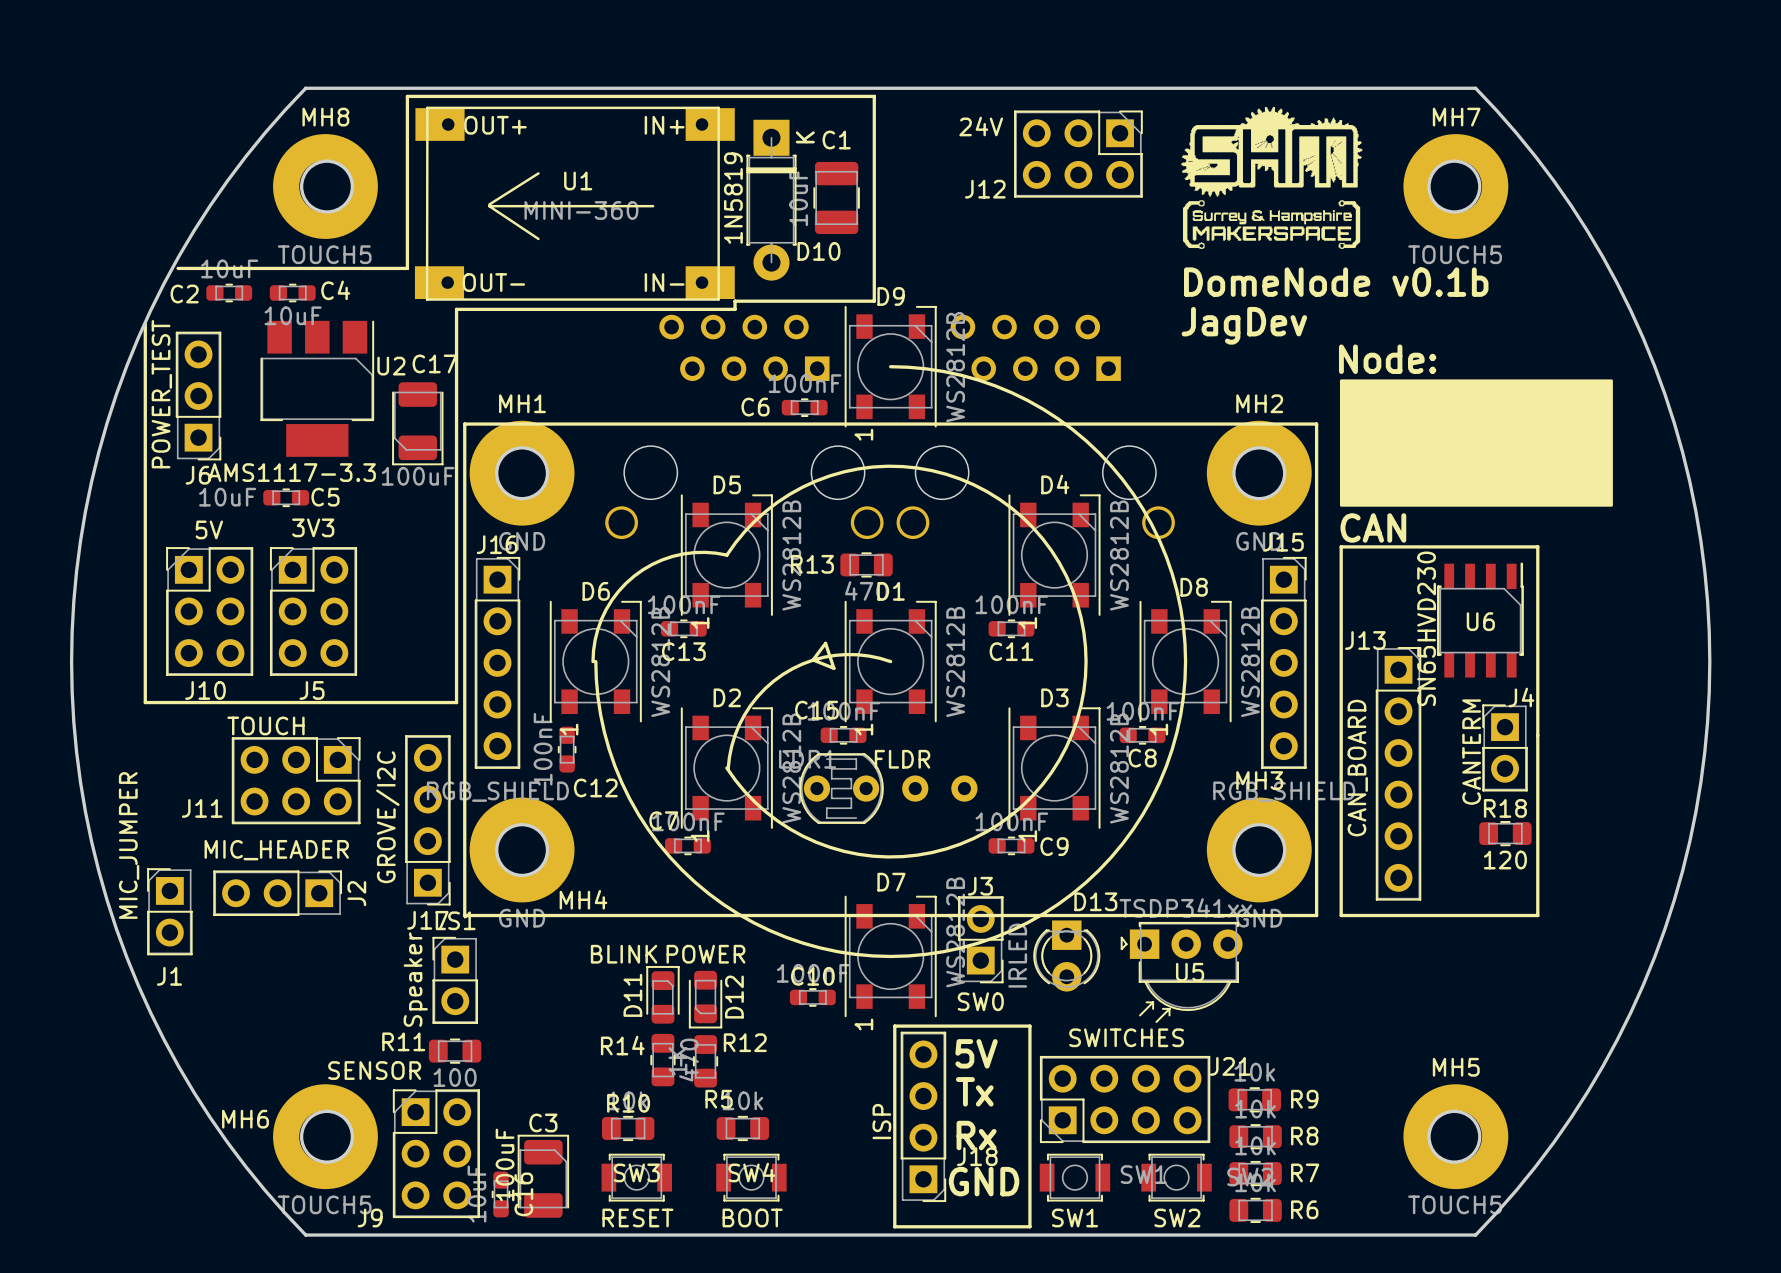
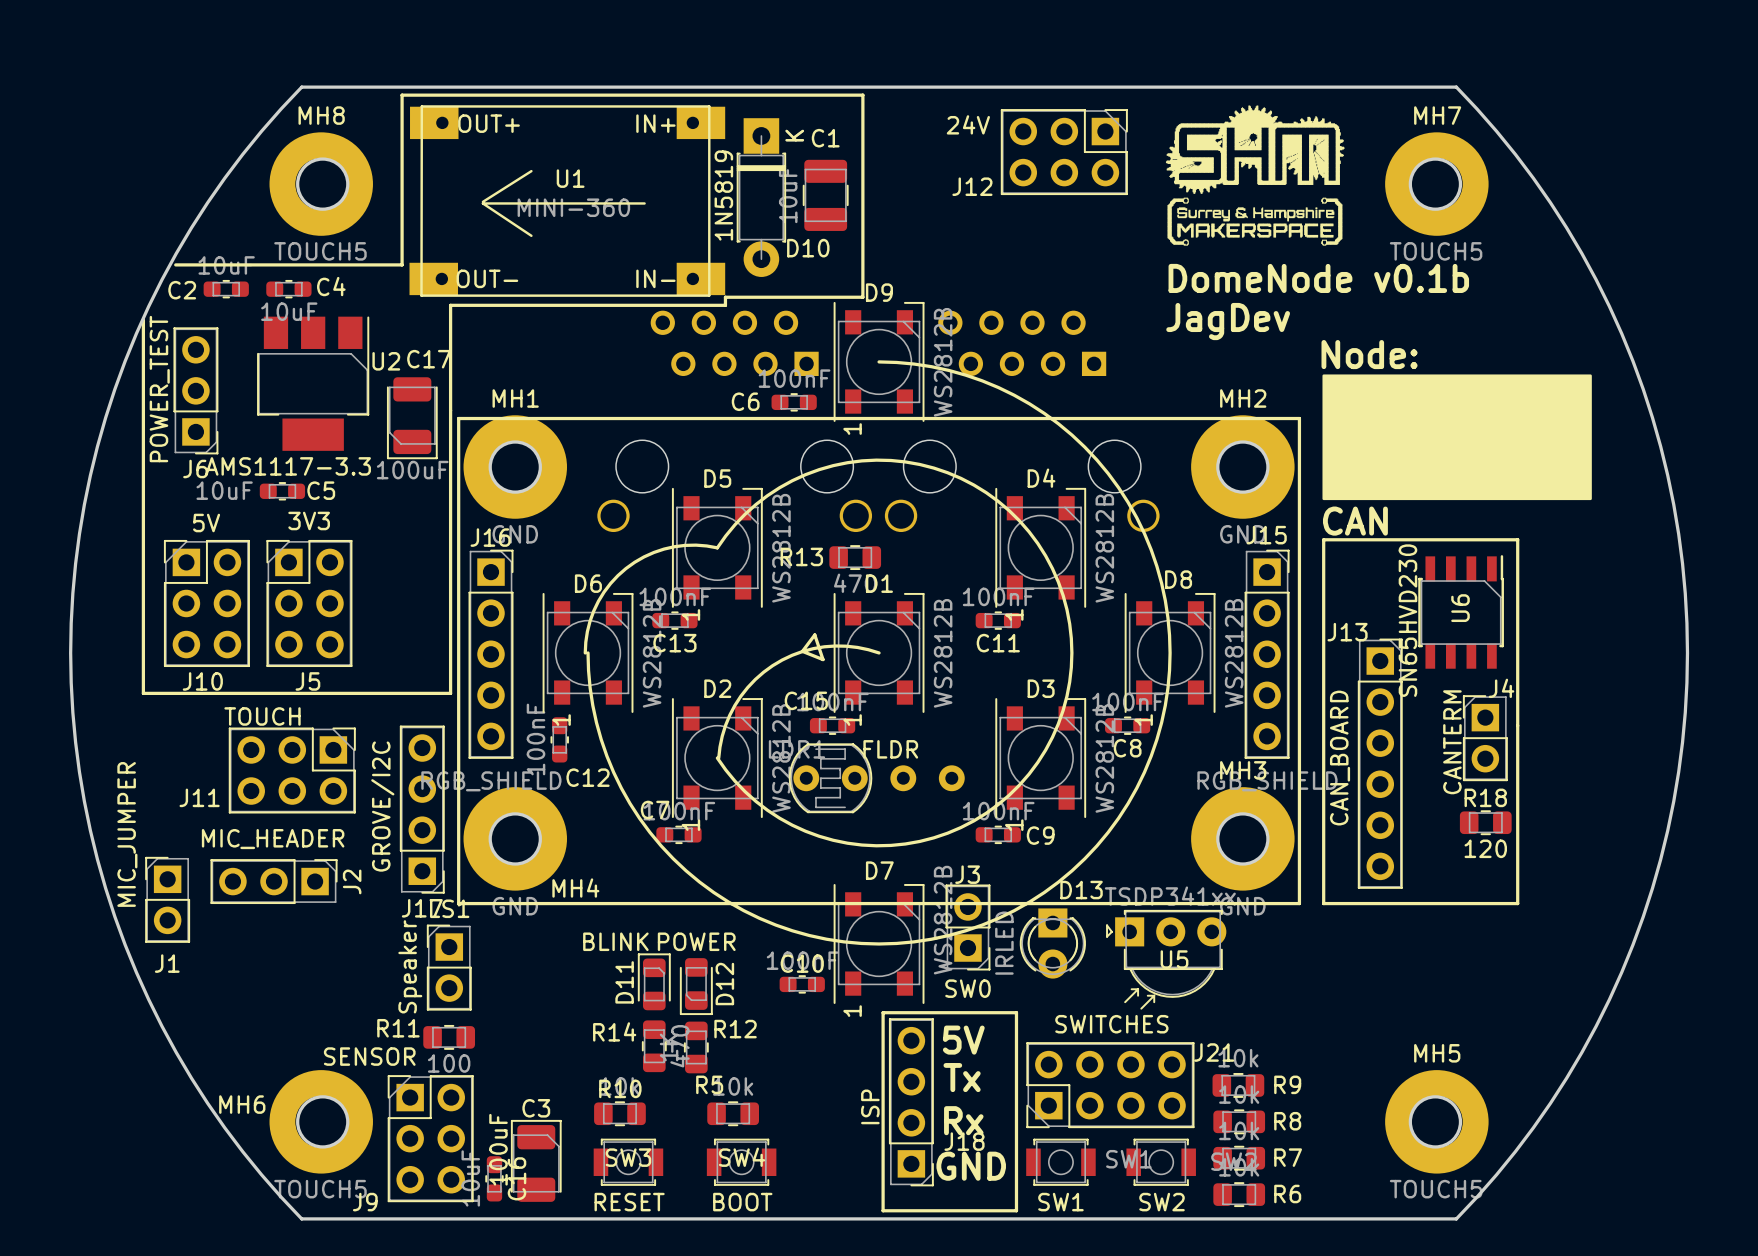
U6 name rotation: 0° (1480, 621) -> 90° counterclockwise (1460, 608)

